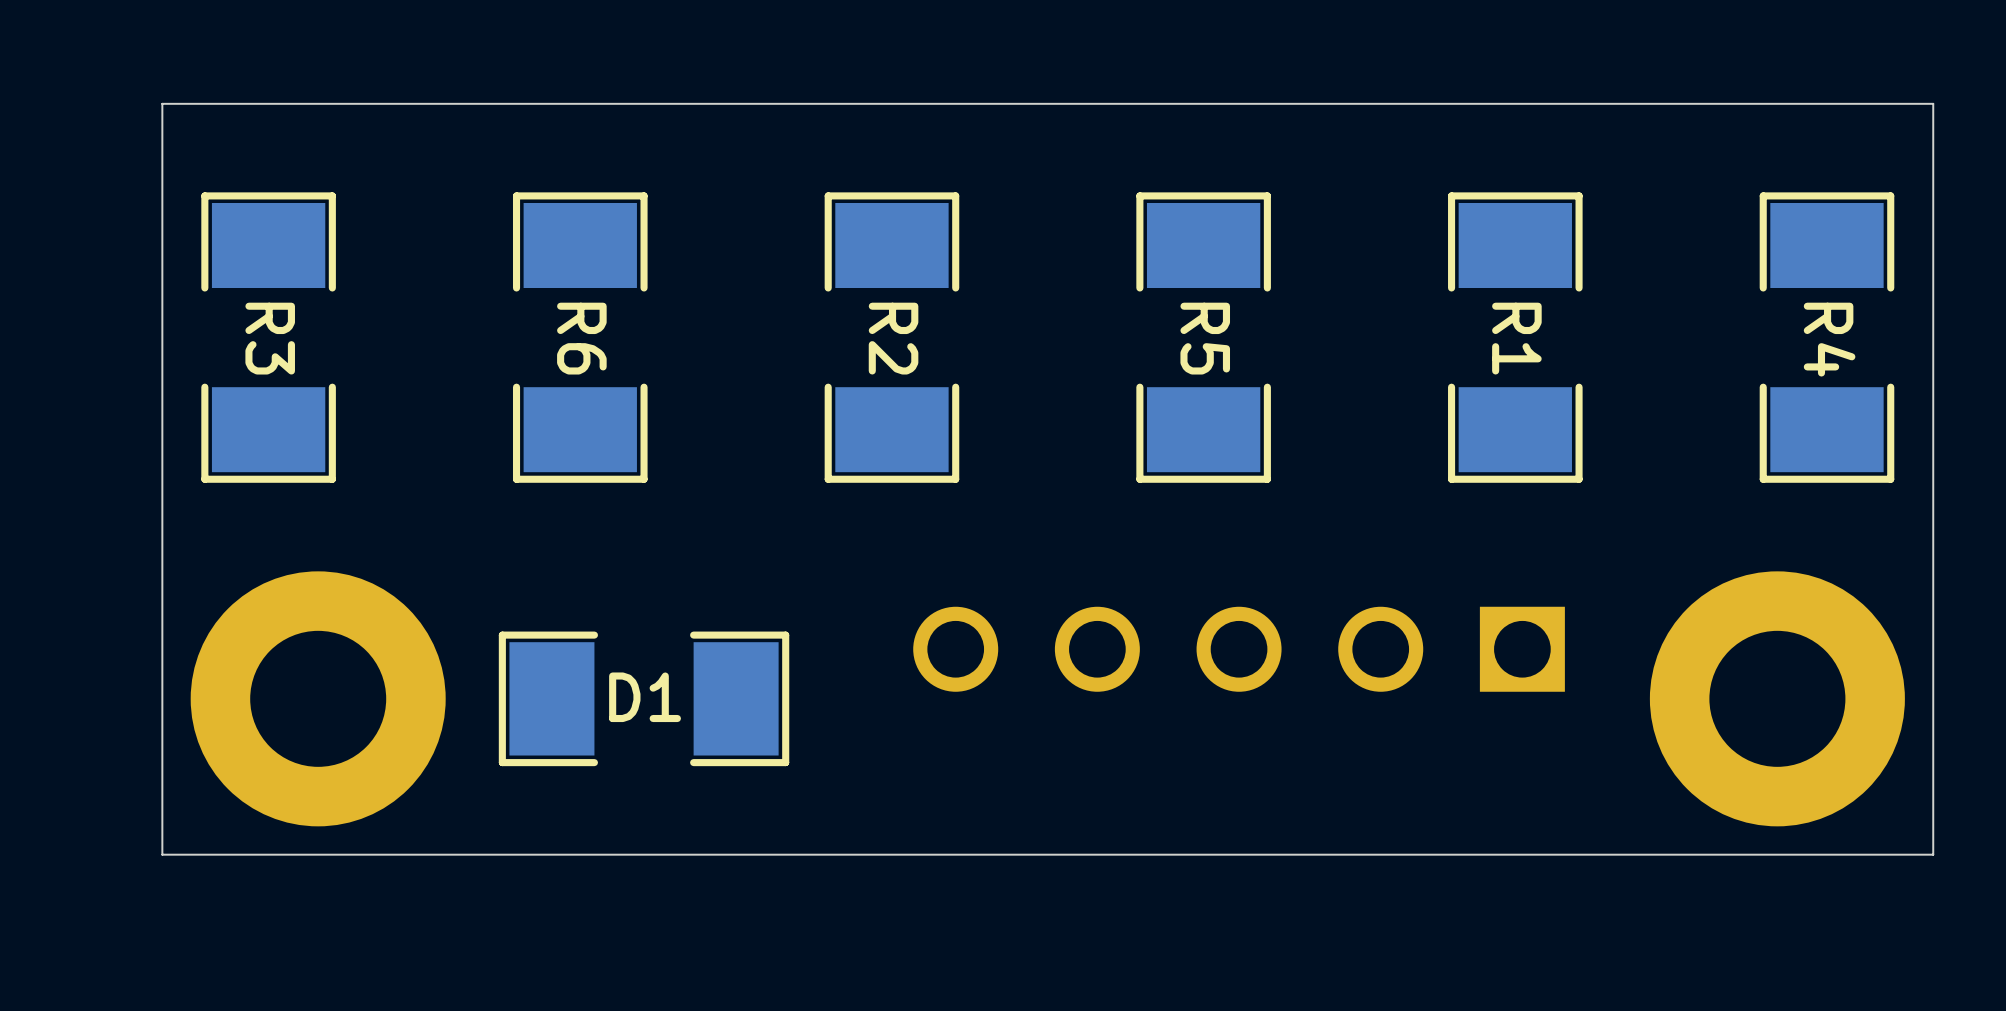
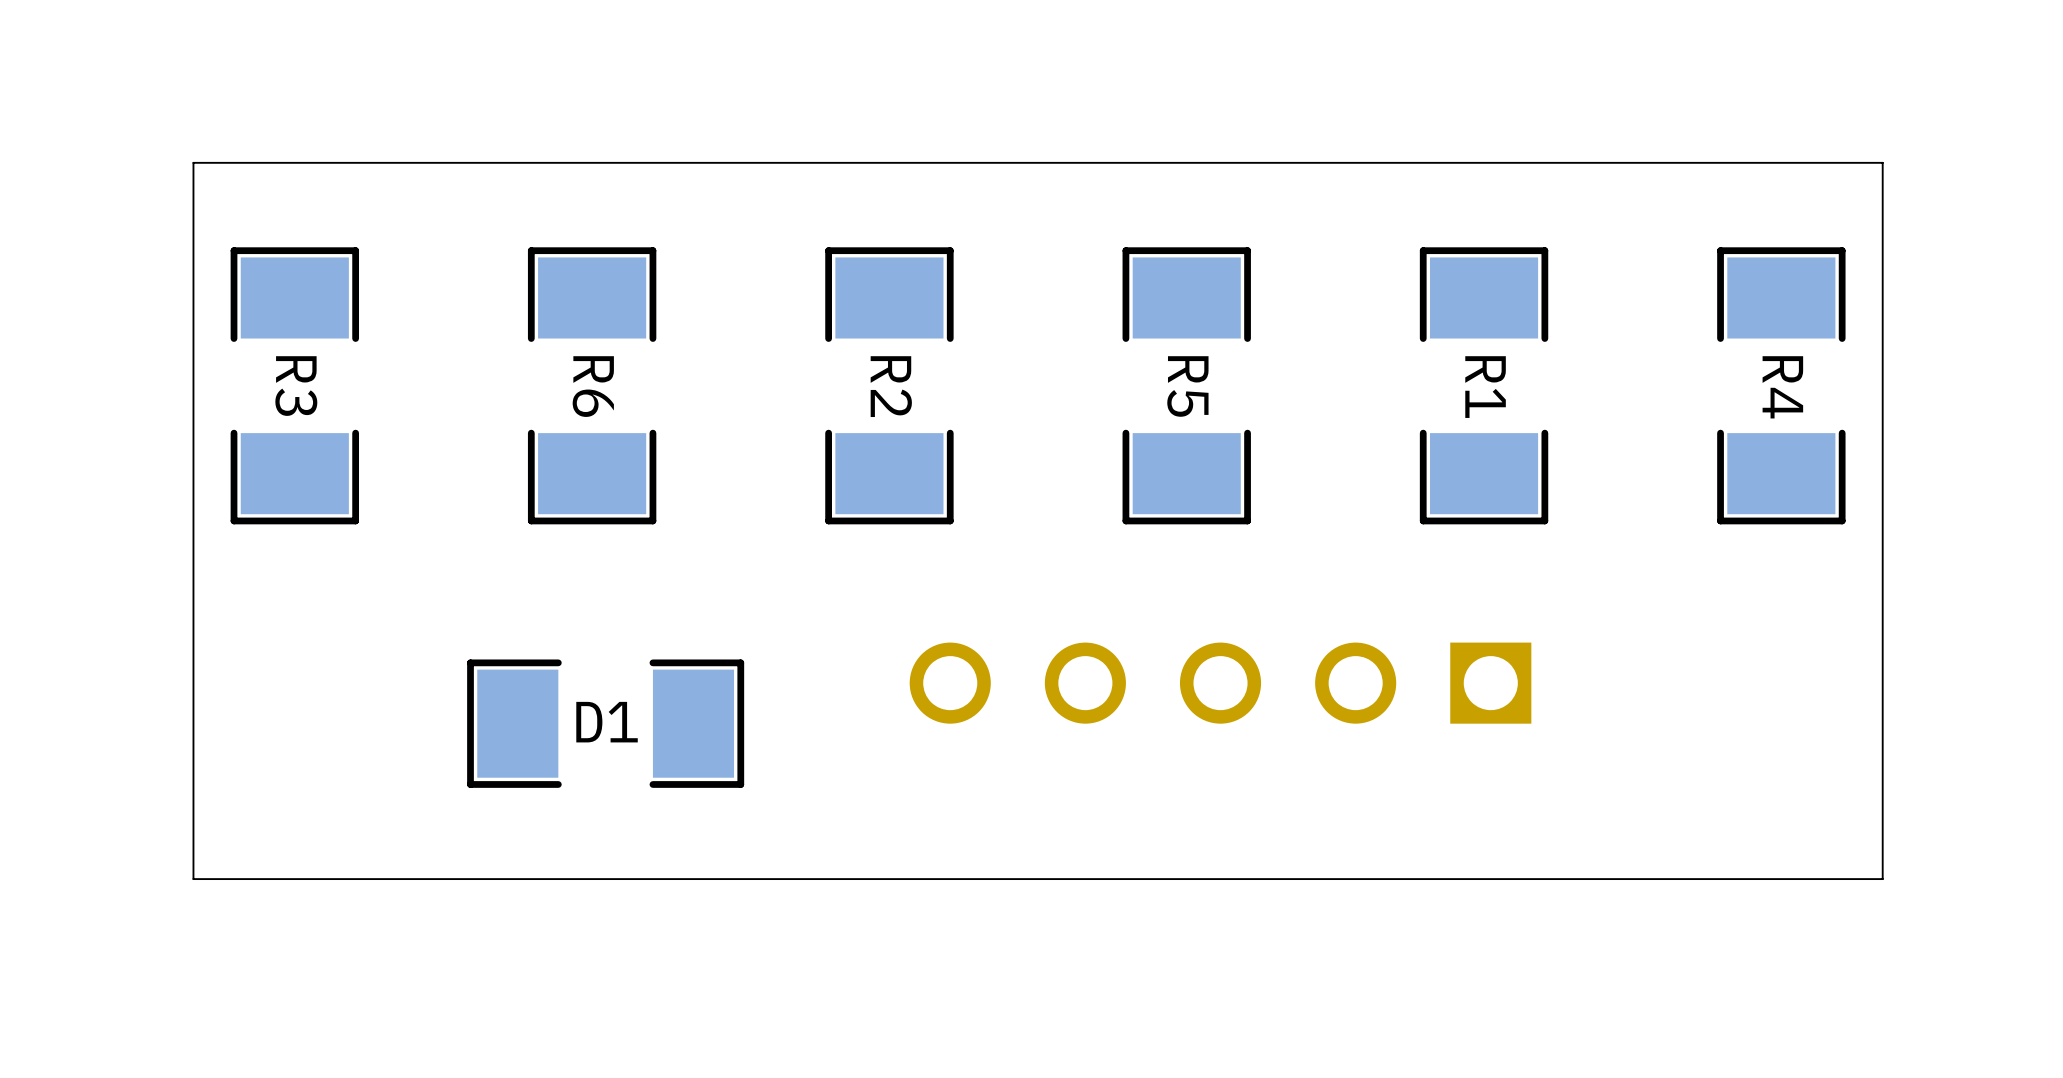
part: (318, 698) -> none
D1 position: (644, 698) -> (605, 723)
part: (1777, 698) -> none

